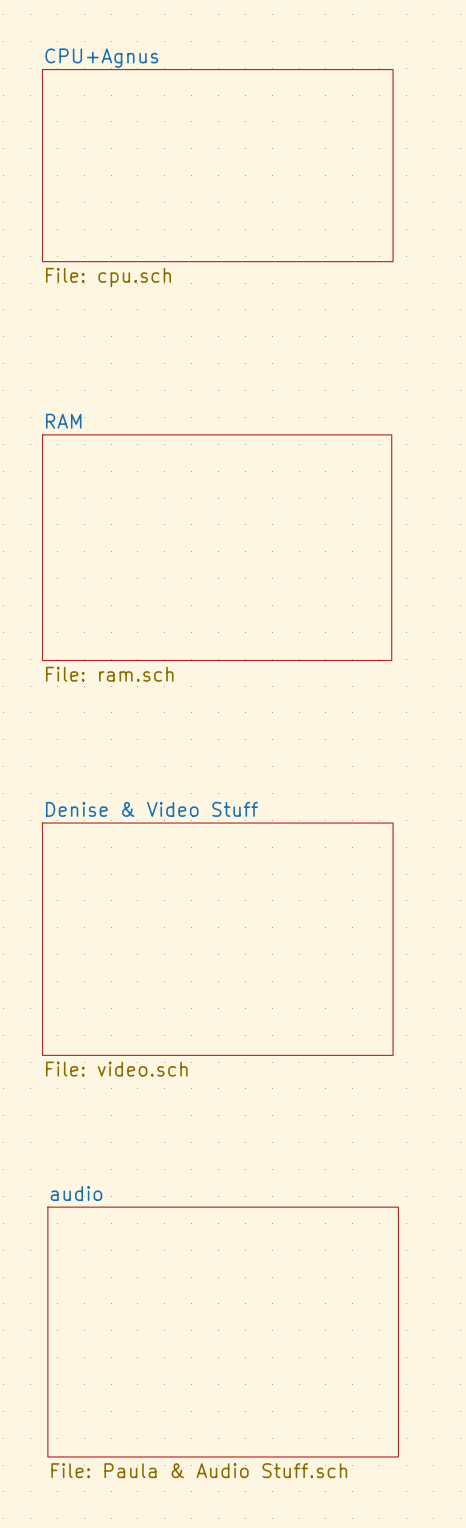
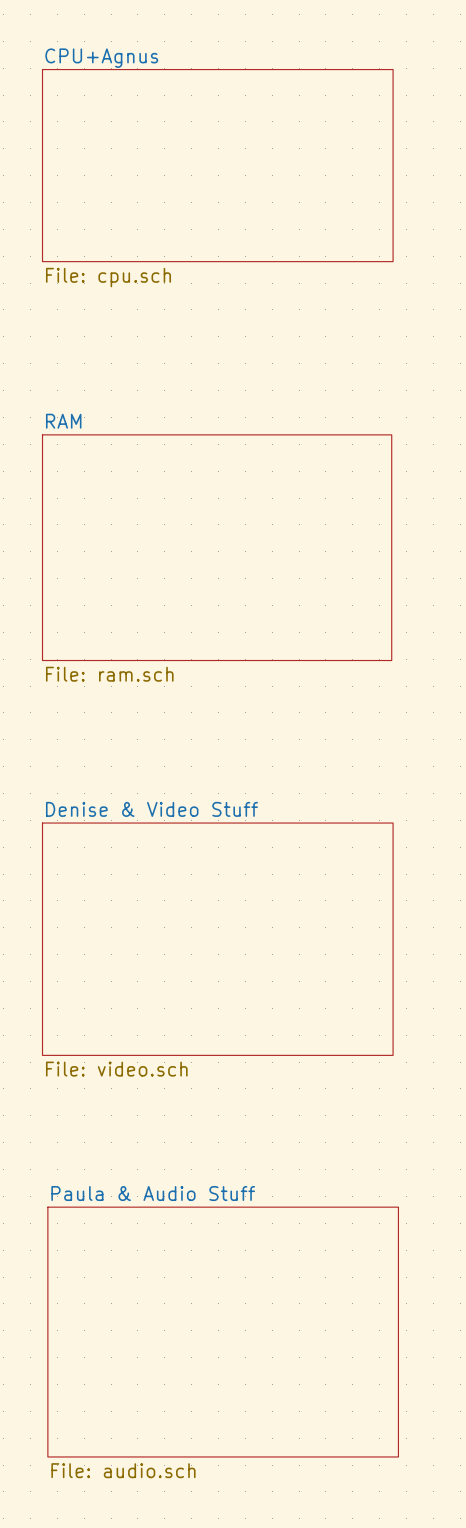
sheet audio name: audio (76, 1193) -> Paula & Audio Stuff (153, 1193)
sheet audio value: File: Paula & Audio Stuff.sch (199, 1470) -> File: audio.sch (123, 1470)

